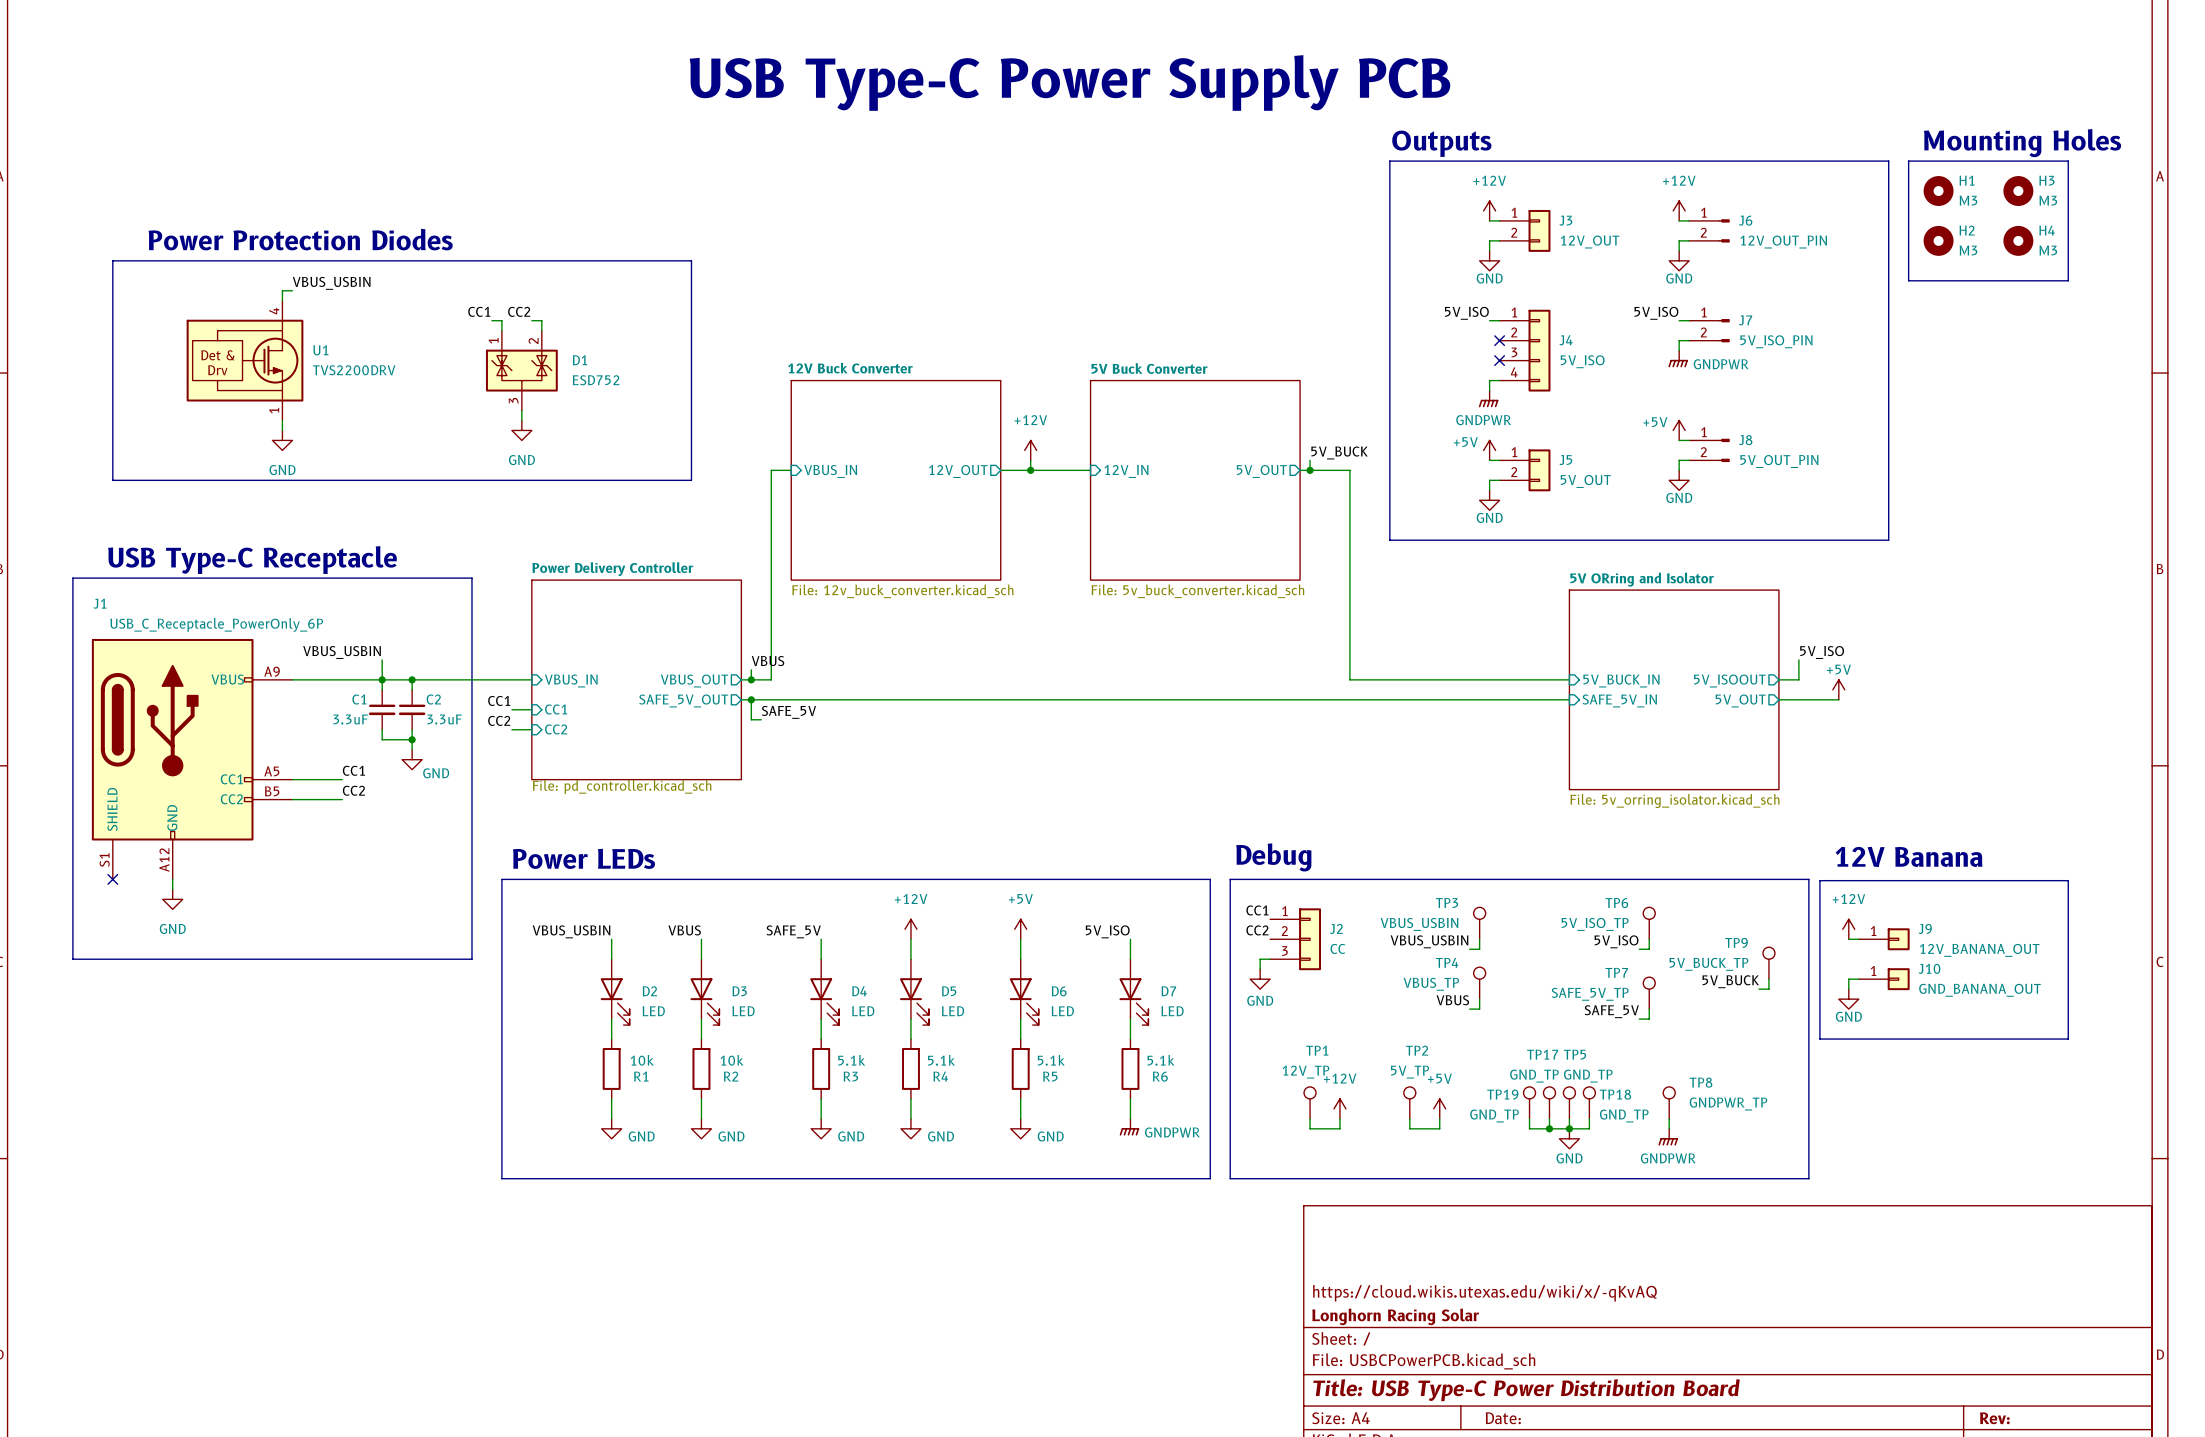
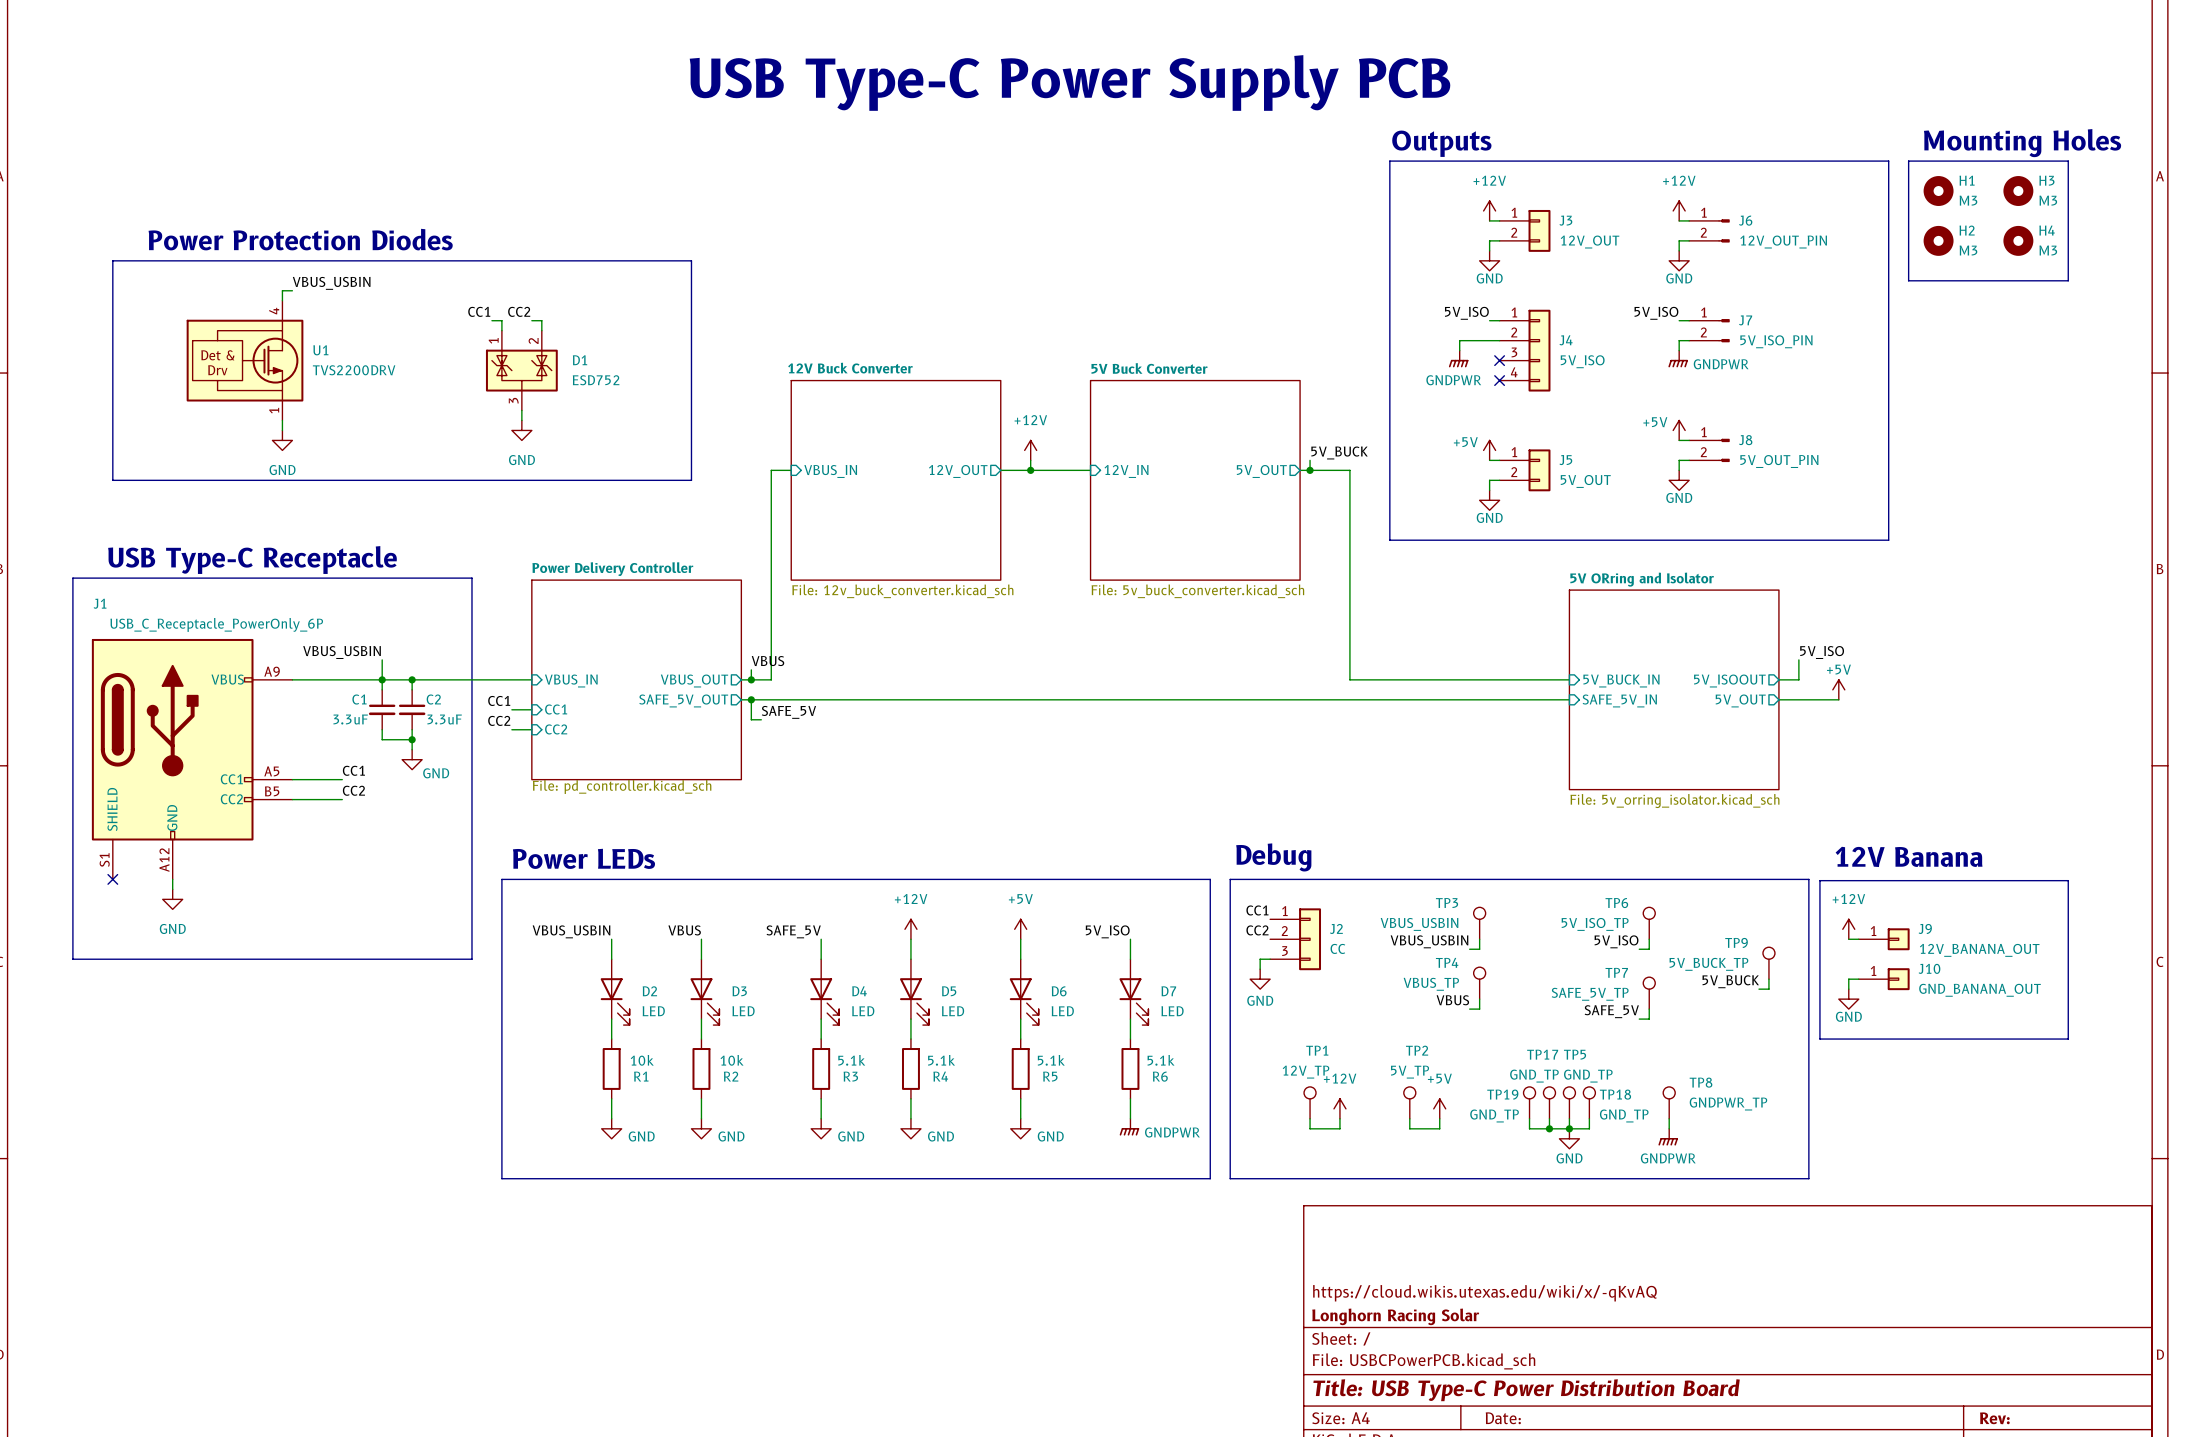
wire: none -> (1499, 340) (1459, 340) (1459, 350)
no-connect mark position: (1499, 340) -> (1499, 380)
wire: (1499, 380) (1489, 380) (1489, 390) -> none
power symbol position: GNDPWR (1488, 398) -> GNDPWR (1458, 359)

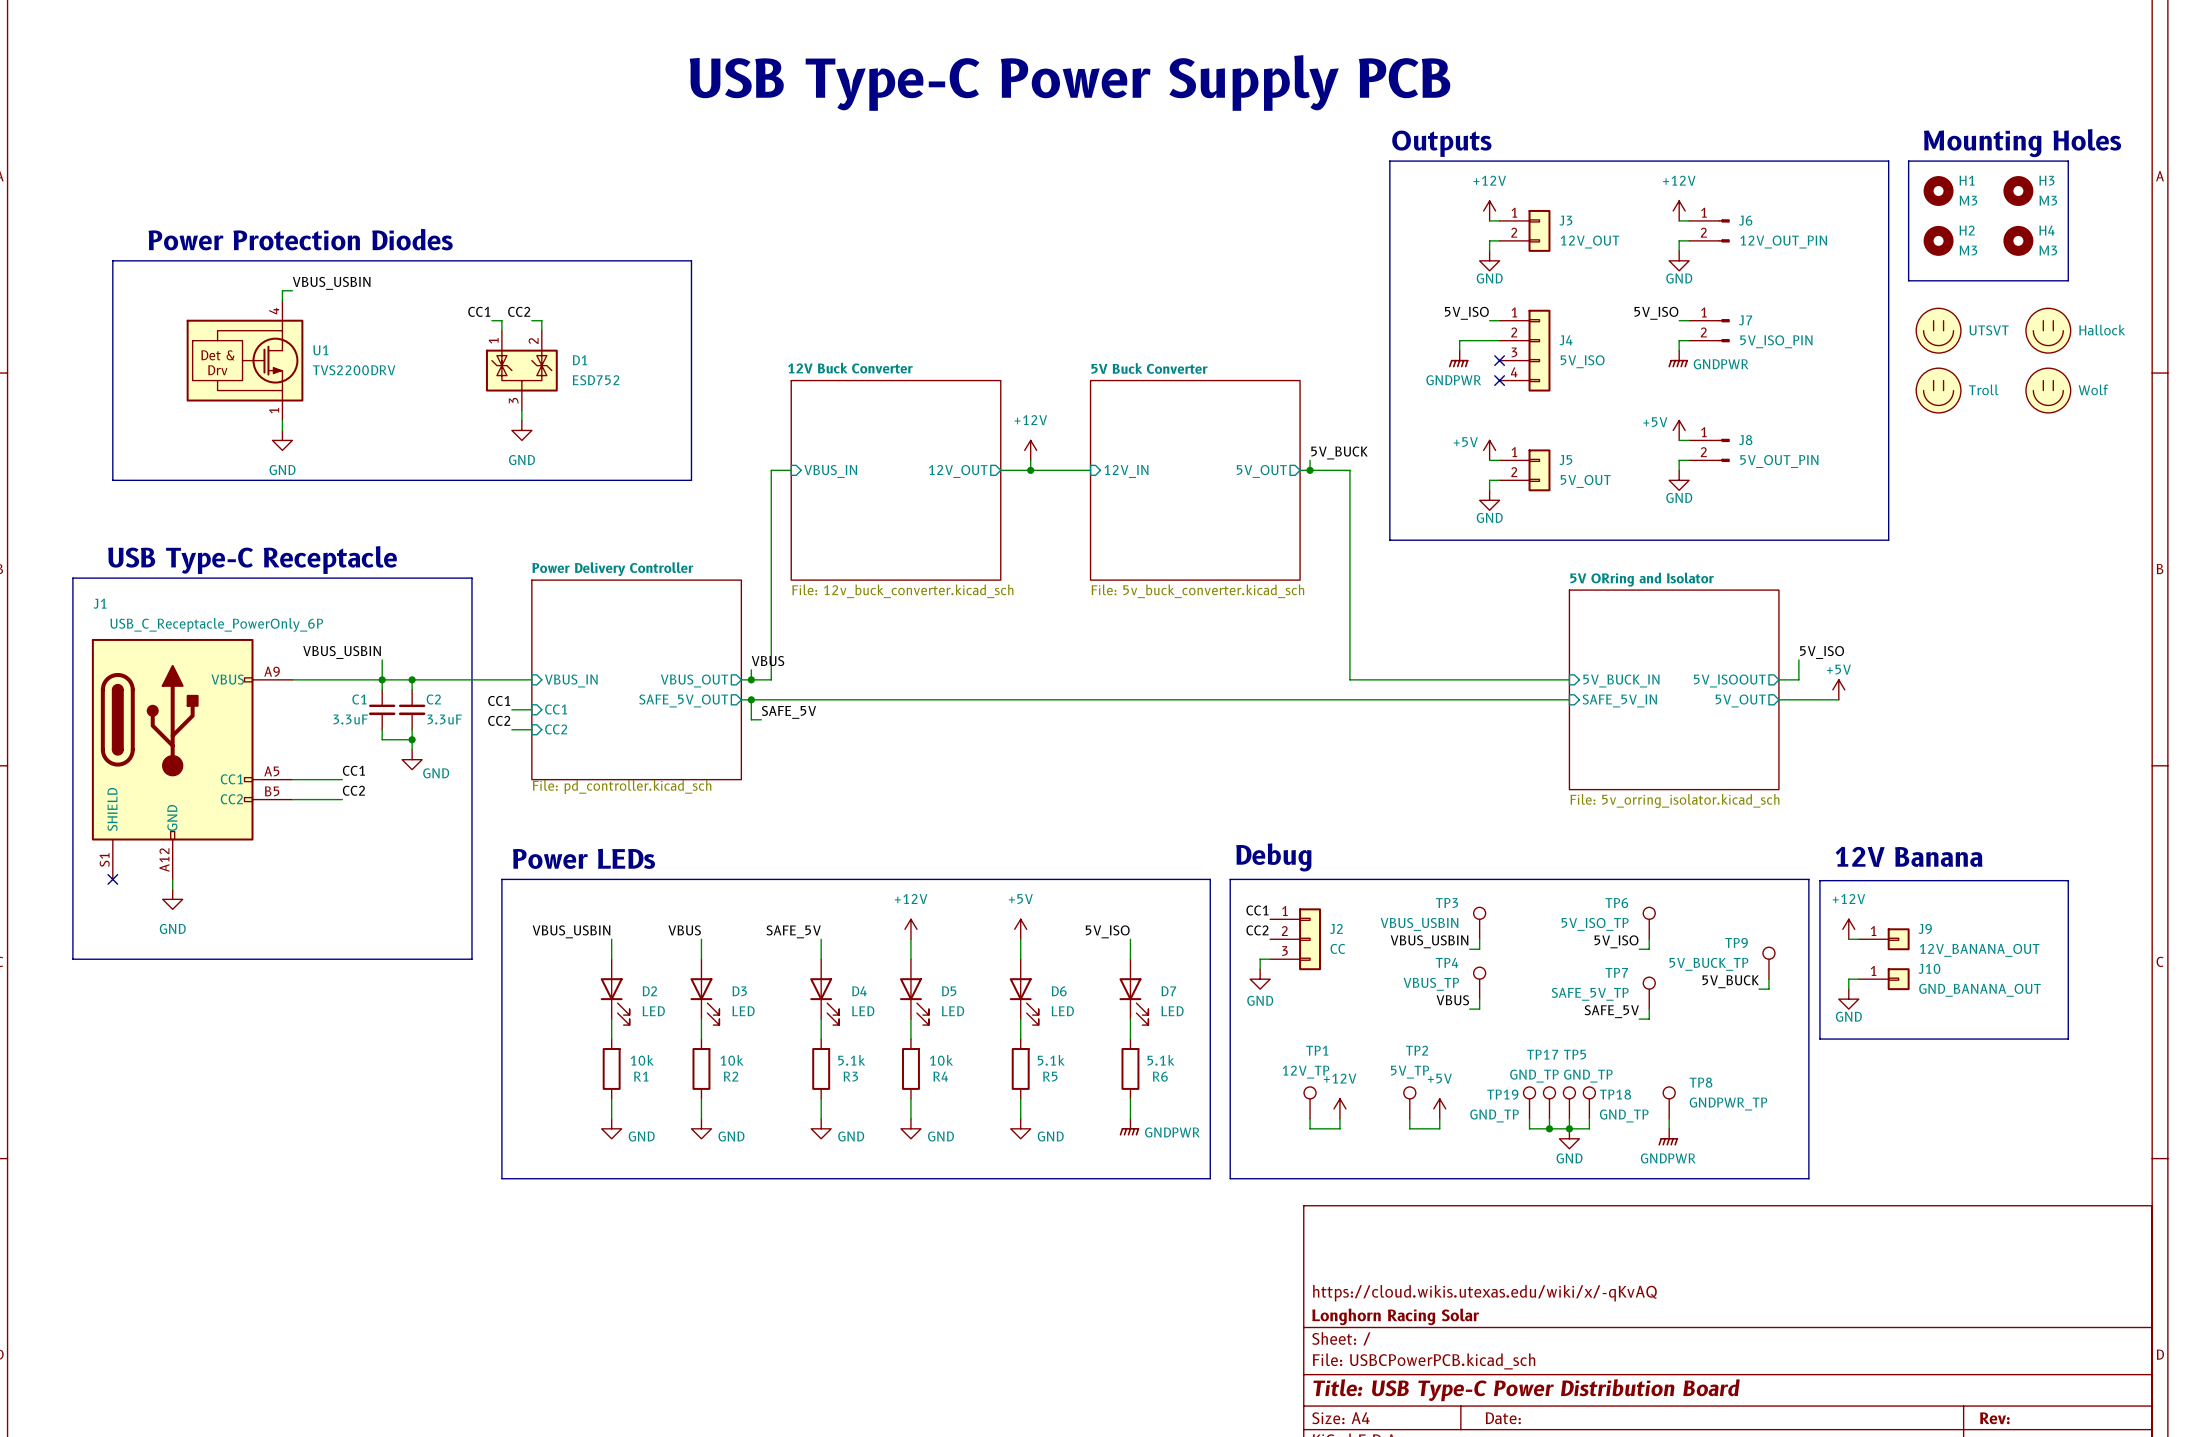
part: none -> UTSVT (1938, 330)
part: none -> Hallock (2048, 330)
part: none -> Troll (1938, 390)
part: none -> Wolf (2048, 390)
R4 value: 5.1k (941, 1060) -> 10k (941, 1060)

